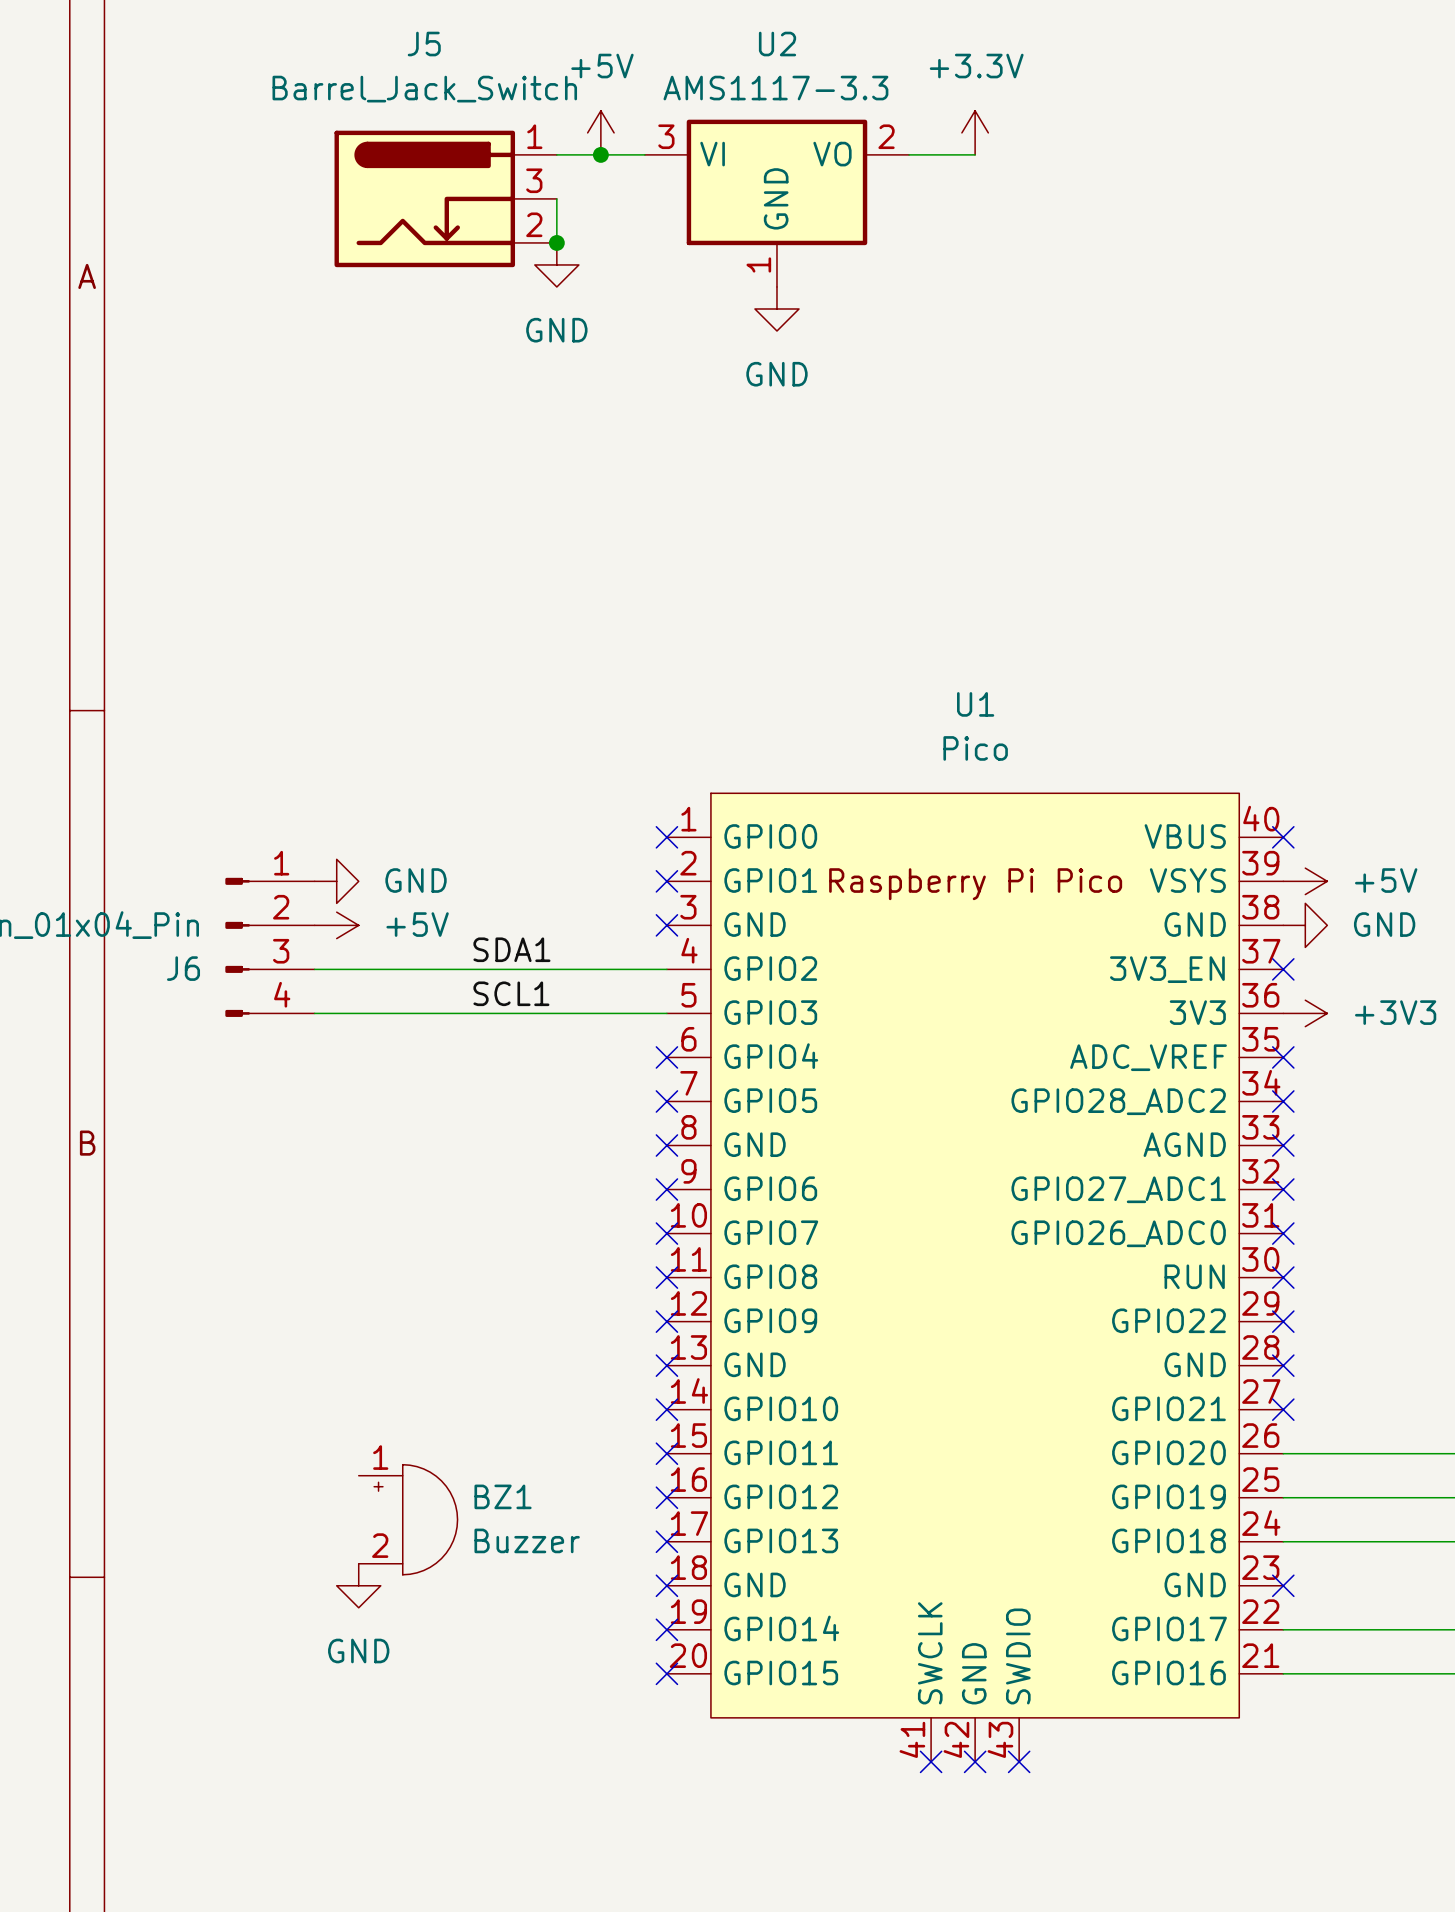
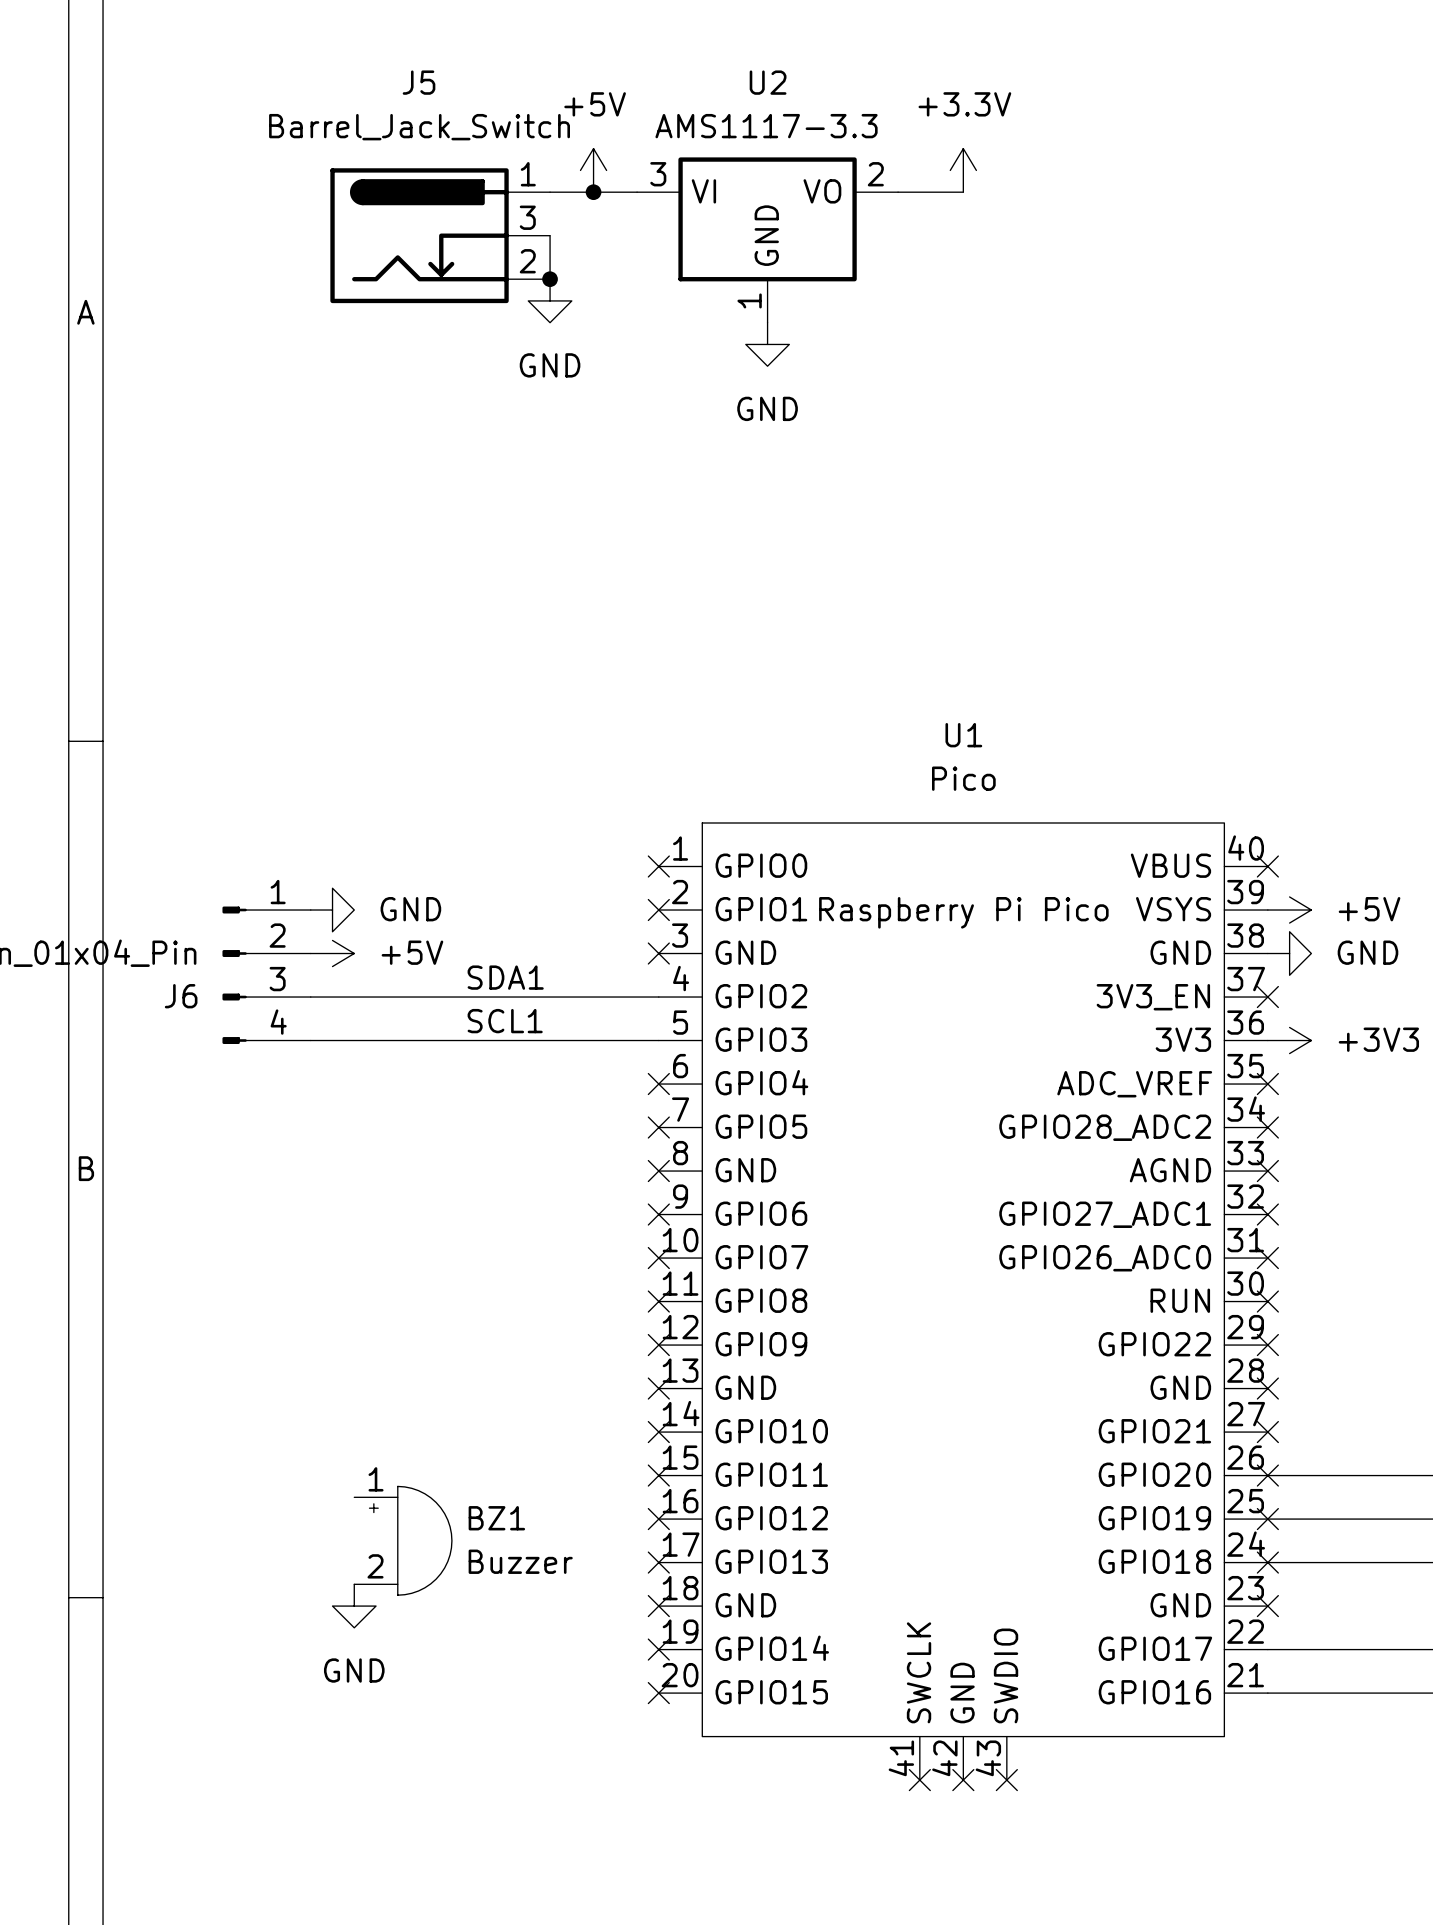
no-connect mark: none -> (1267, 1475)
no-connect mark: none -> (1267, 1519)
no-connect mark: none -> (1267, 1562)

